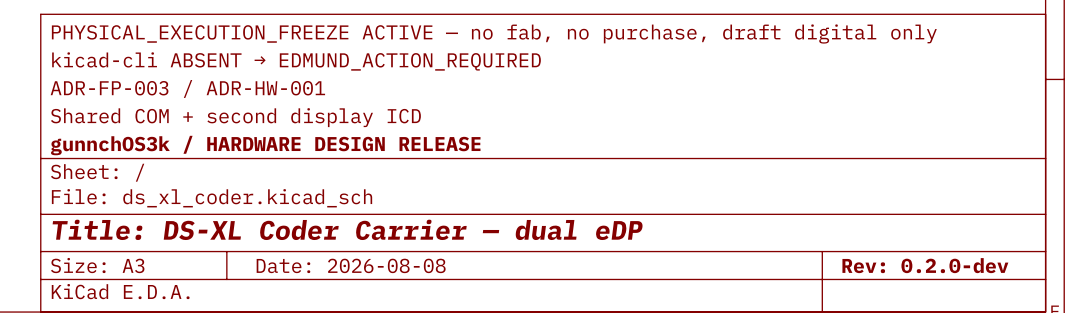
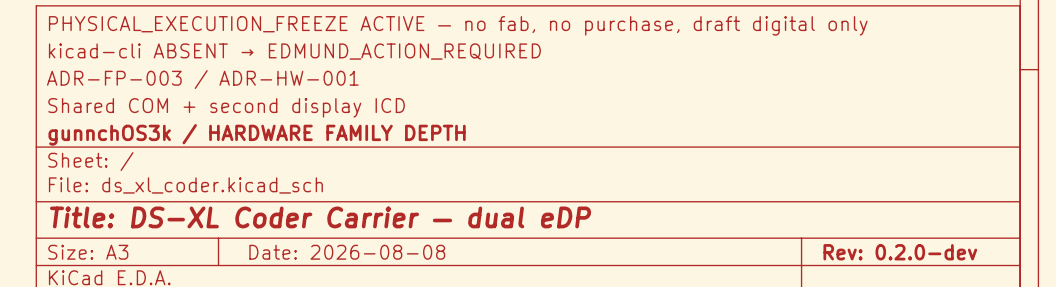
title block: gunnchOS3k / HARDWARE DESIGN RELEASE (265, 145) -> gunnchOS3k / HARDWARE FAMILY DEPTH (257, 134)

